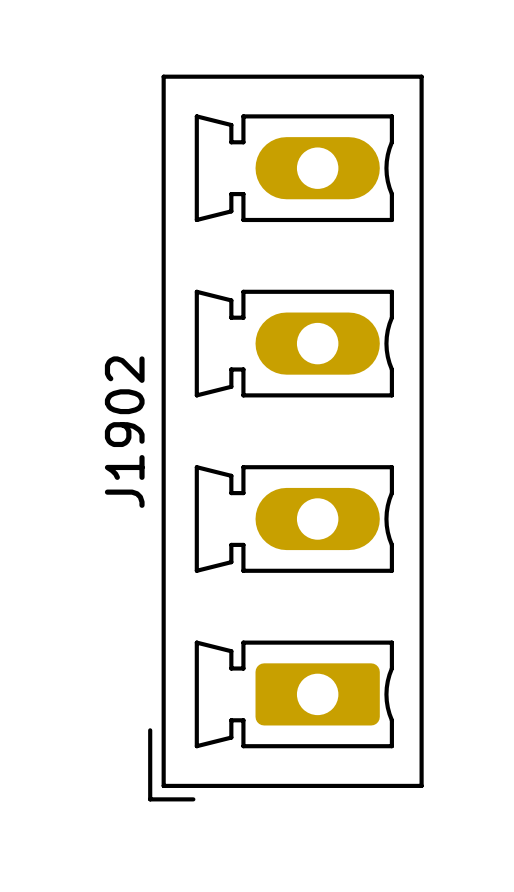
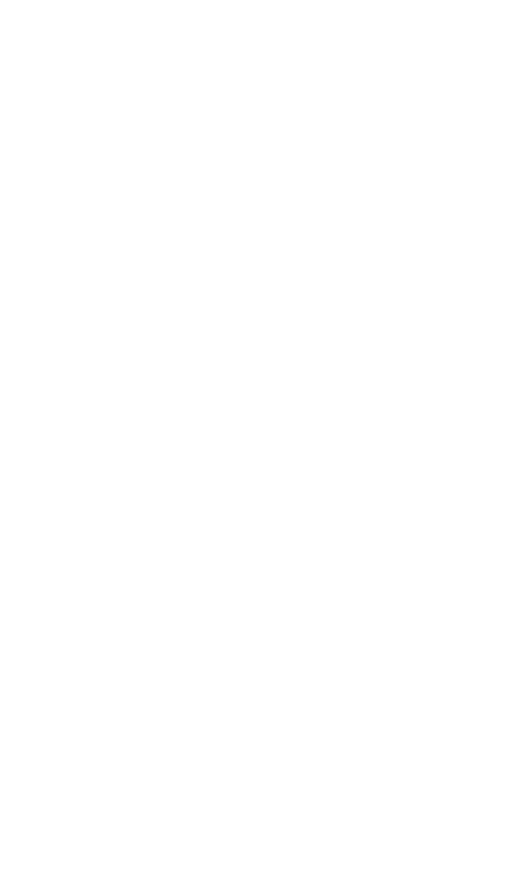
J1902: (285, 438) -> none

